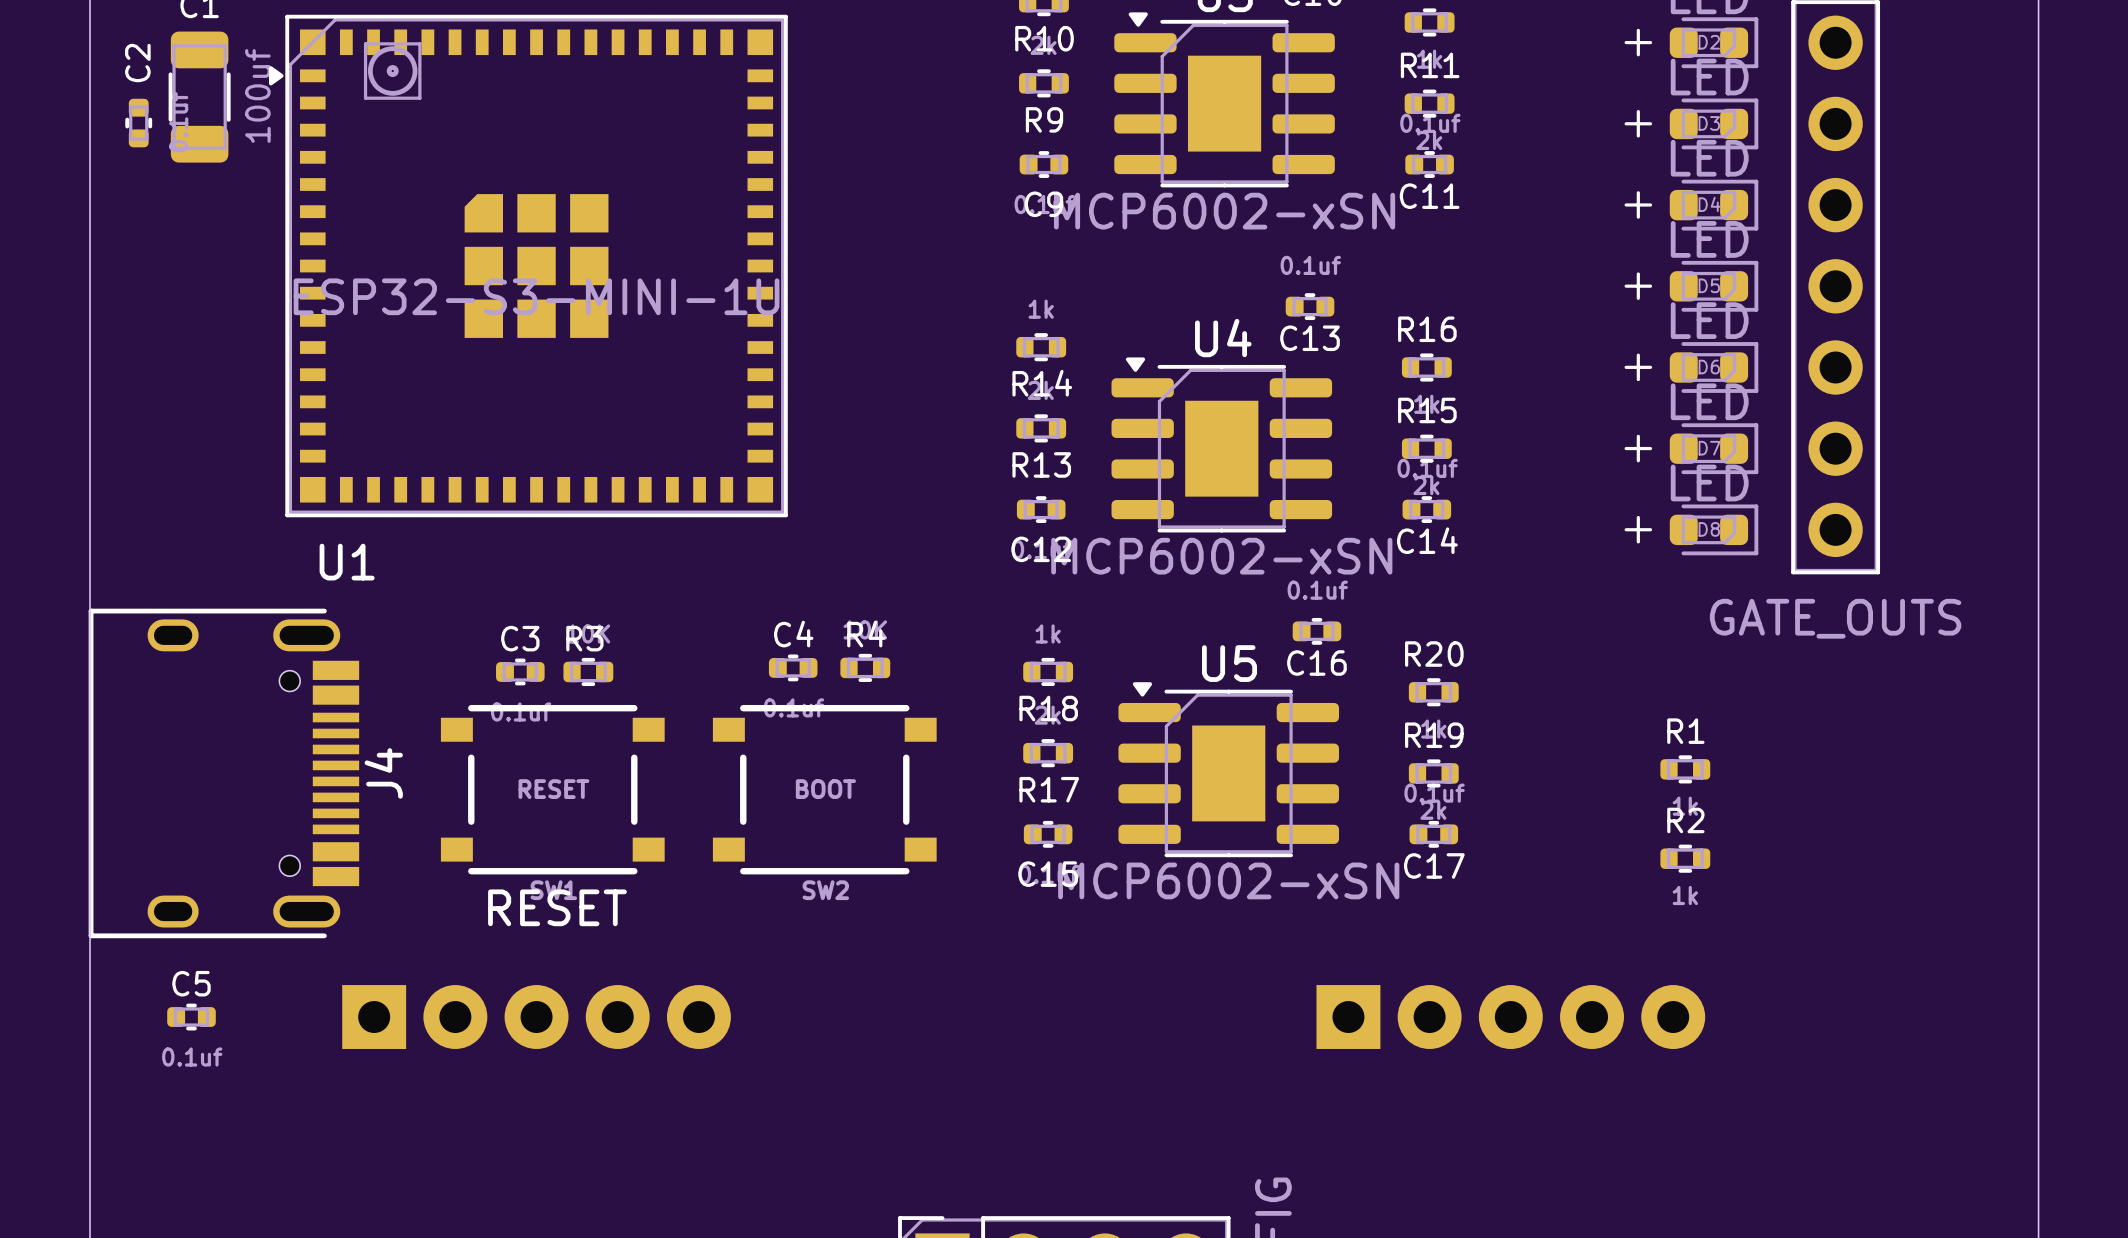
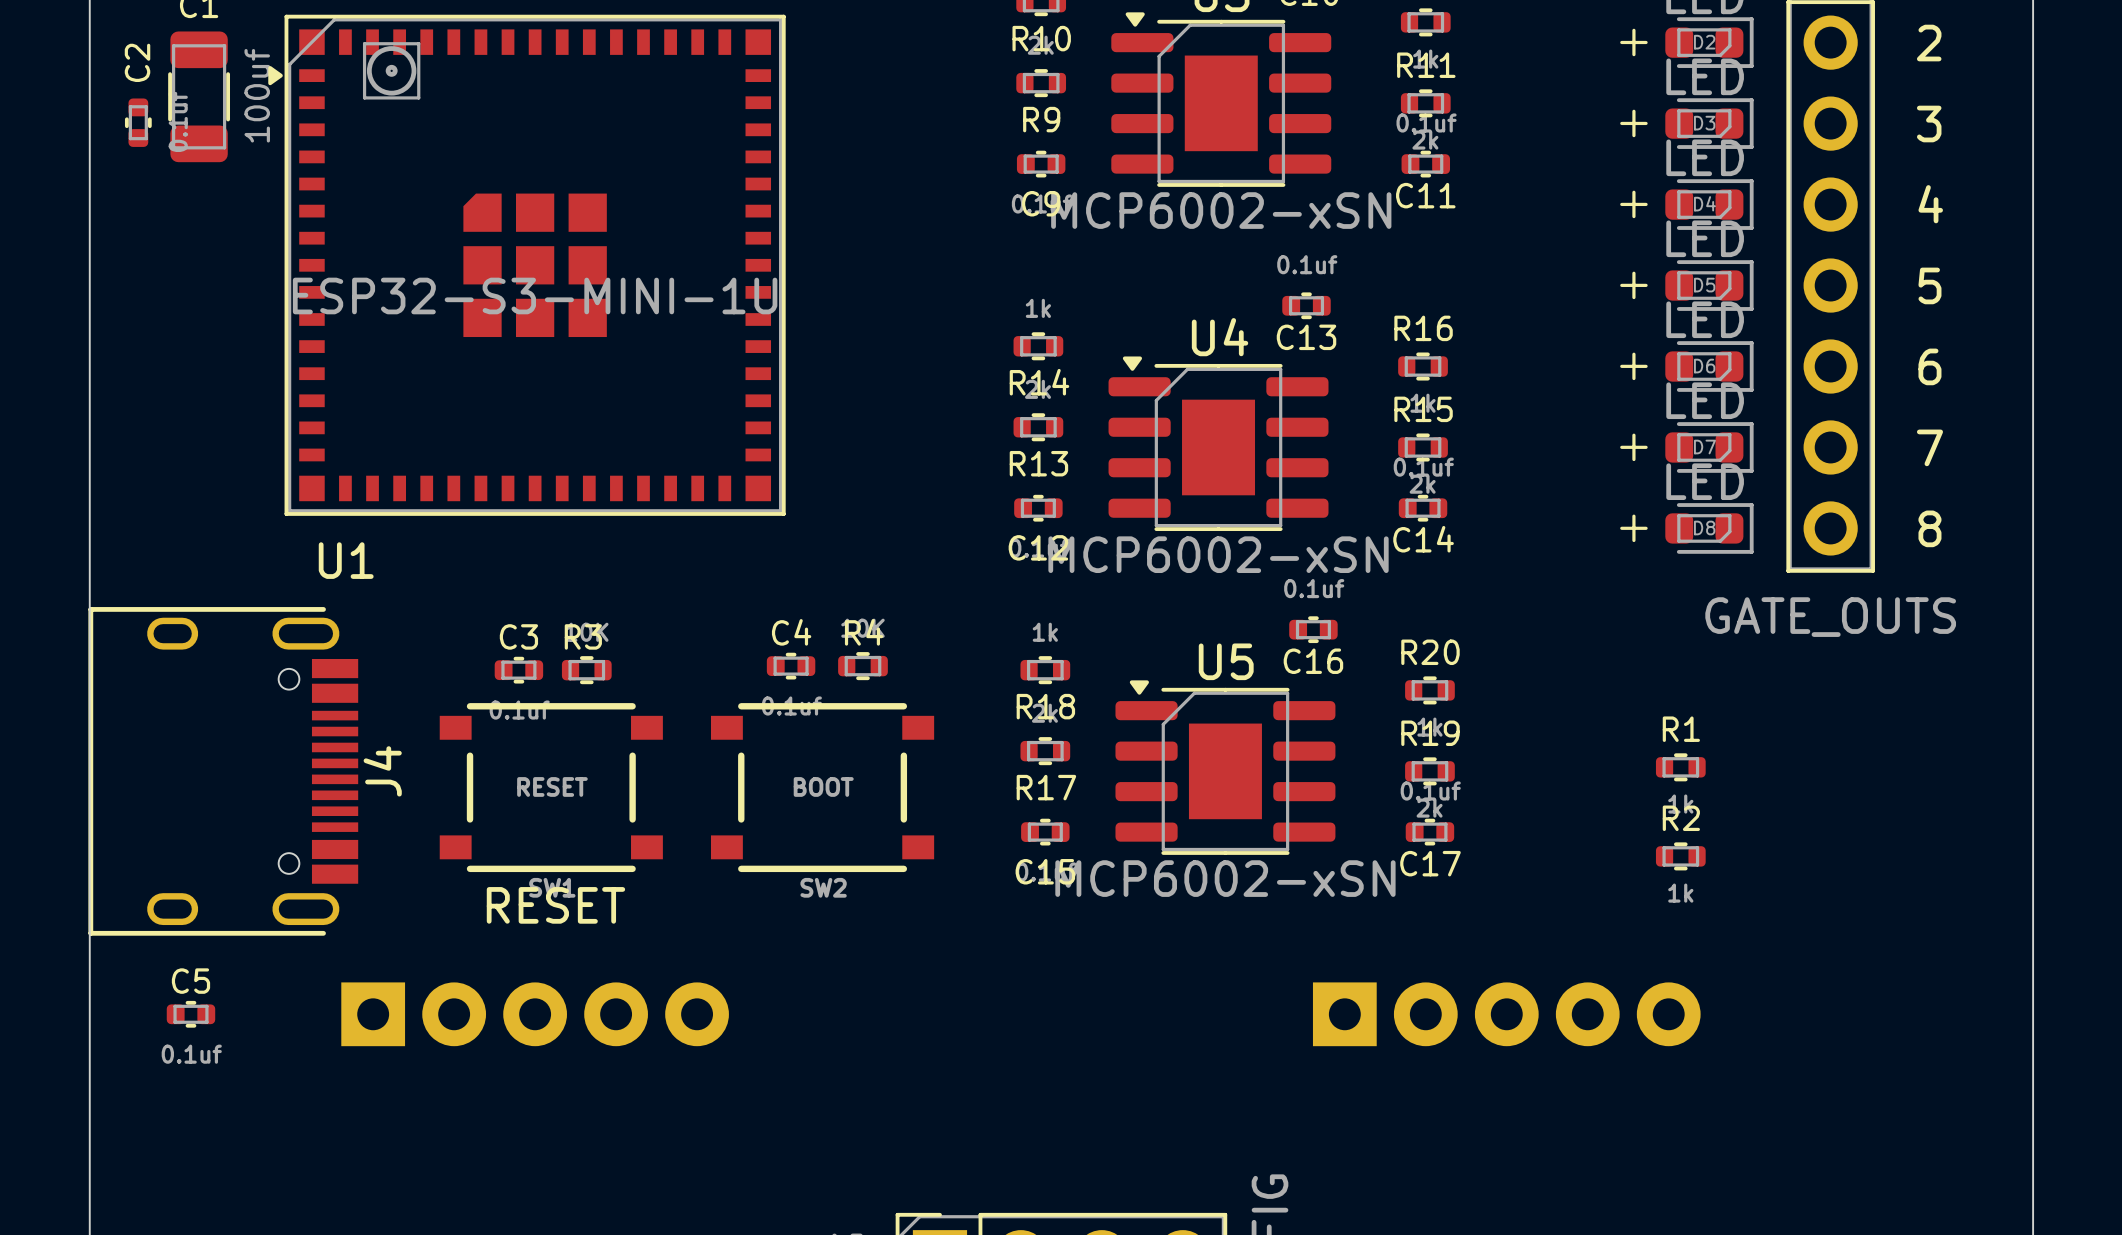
text: none -> 2 (1929, 43)
text: none -> 3 (1929, 124)
text: none -> 4 (1930, 204)
text: none -> 5 (1929, 285)
text: none -> 6 (1929, 366)
text: none -> 7 (1929, 447)
text: none -> 8 (1929, 528)

